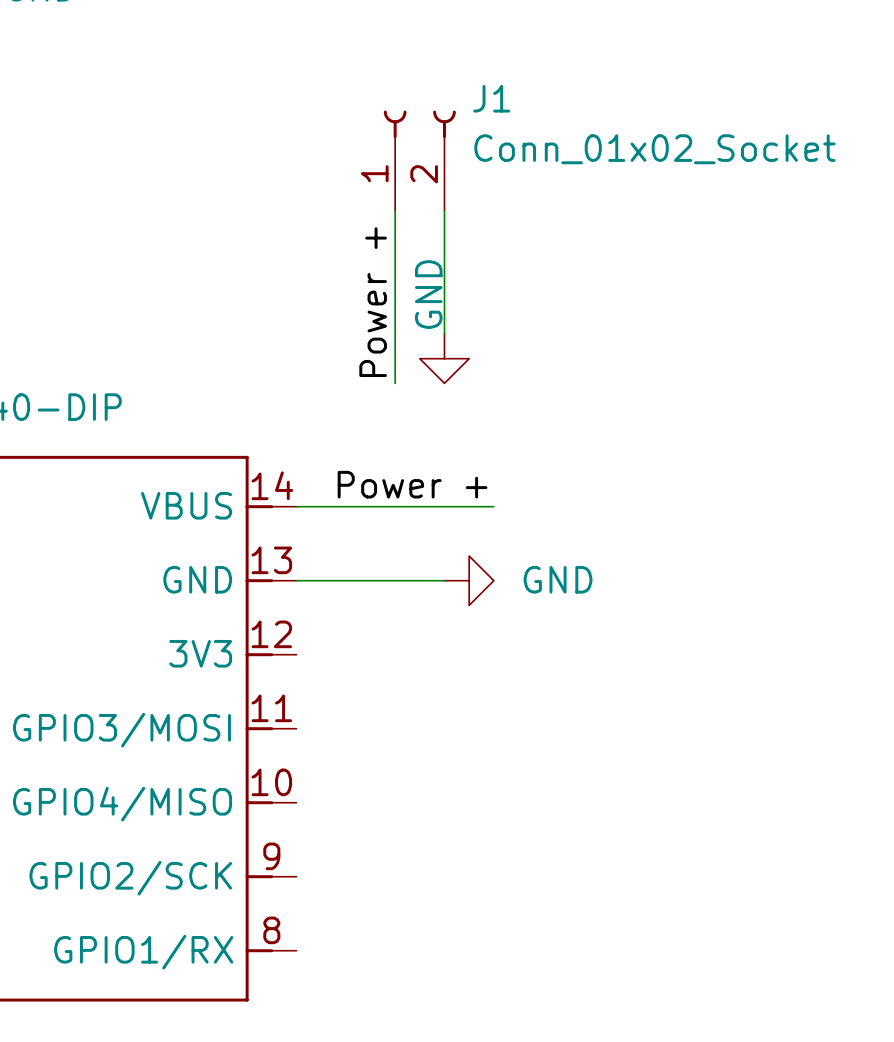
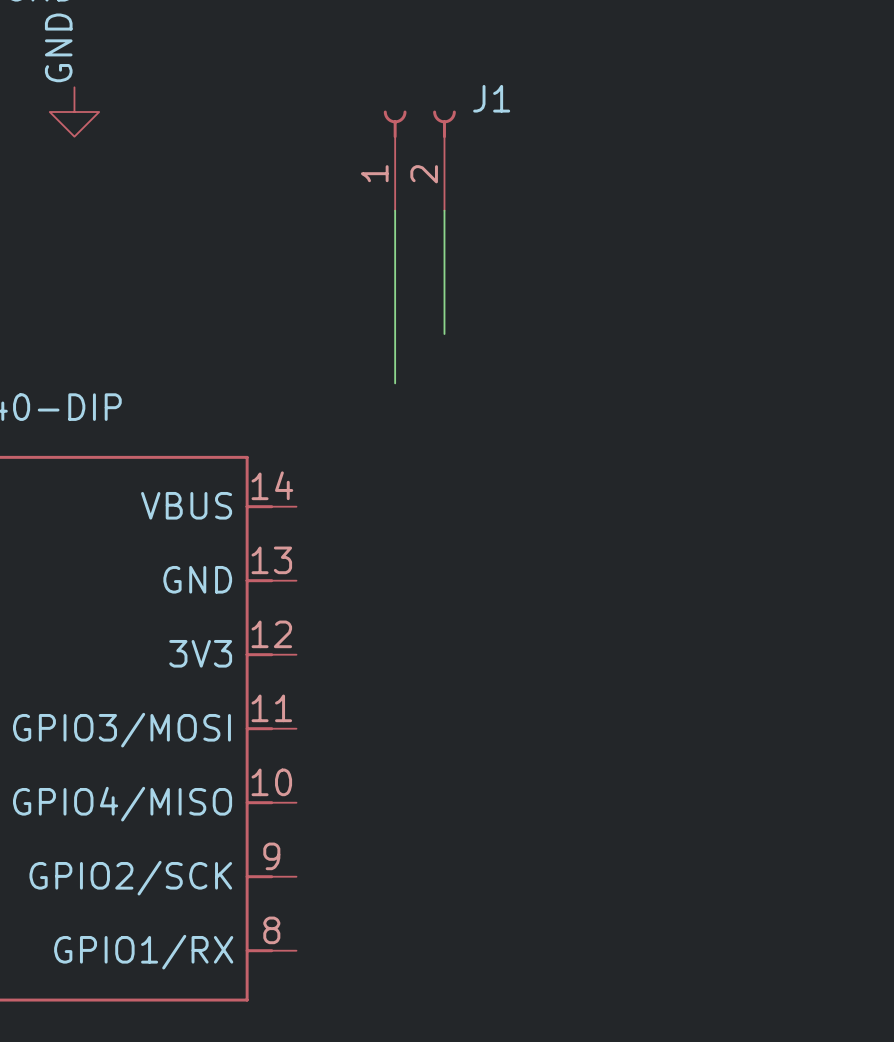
power symbol: none -> GND (74, 112)
J1 value: Conn_01x02_Socket (654, 149) -> none
label: Power + (373, 302) -> none
power symbol: GND (444, 358) -> none
label: Power + (412, 484) -> none
wire: (296, 506) (493, 506) -> none
wire: (296, 580) (444, 580) -> none
power symbol: GND (469, 580) -> none

